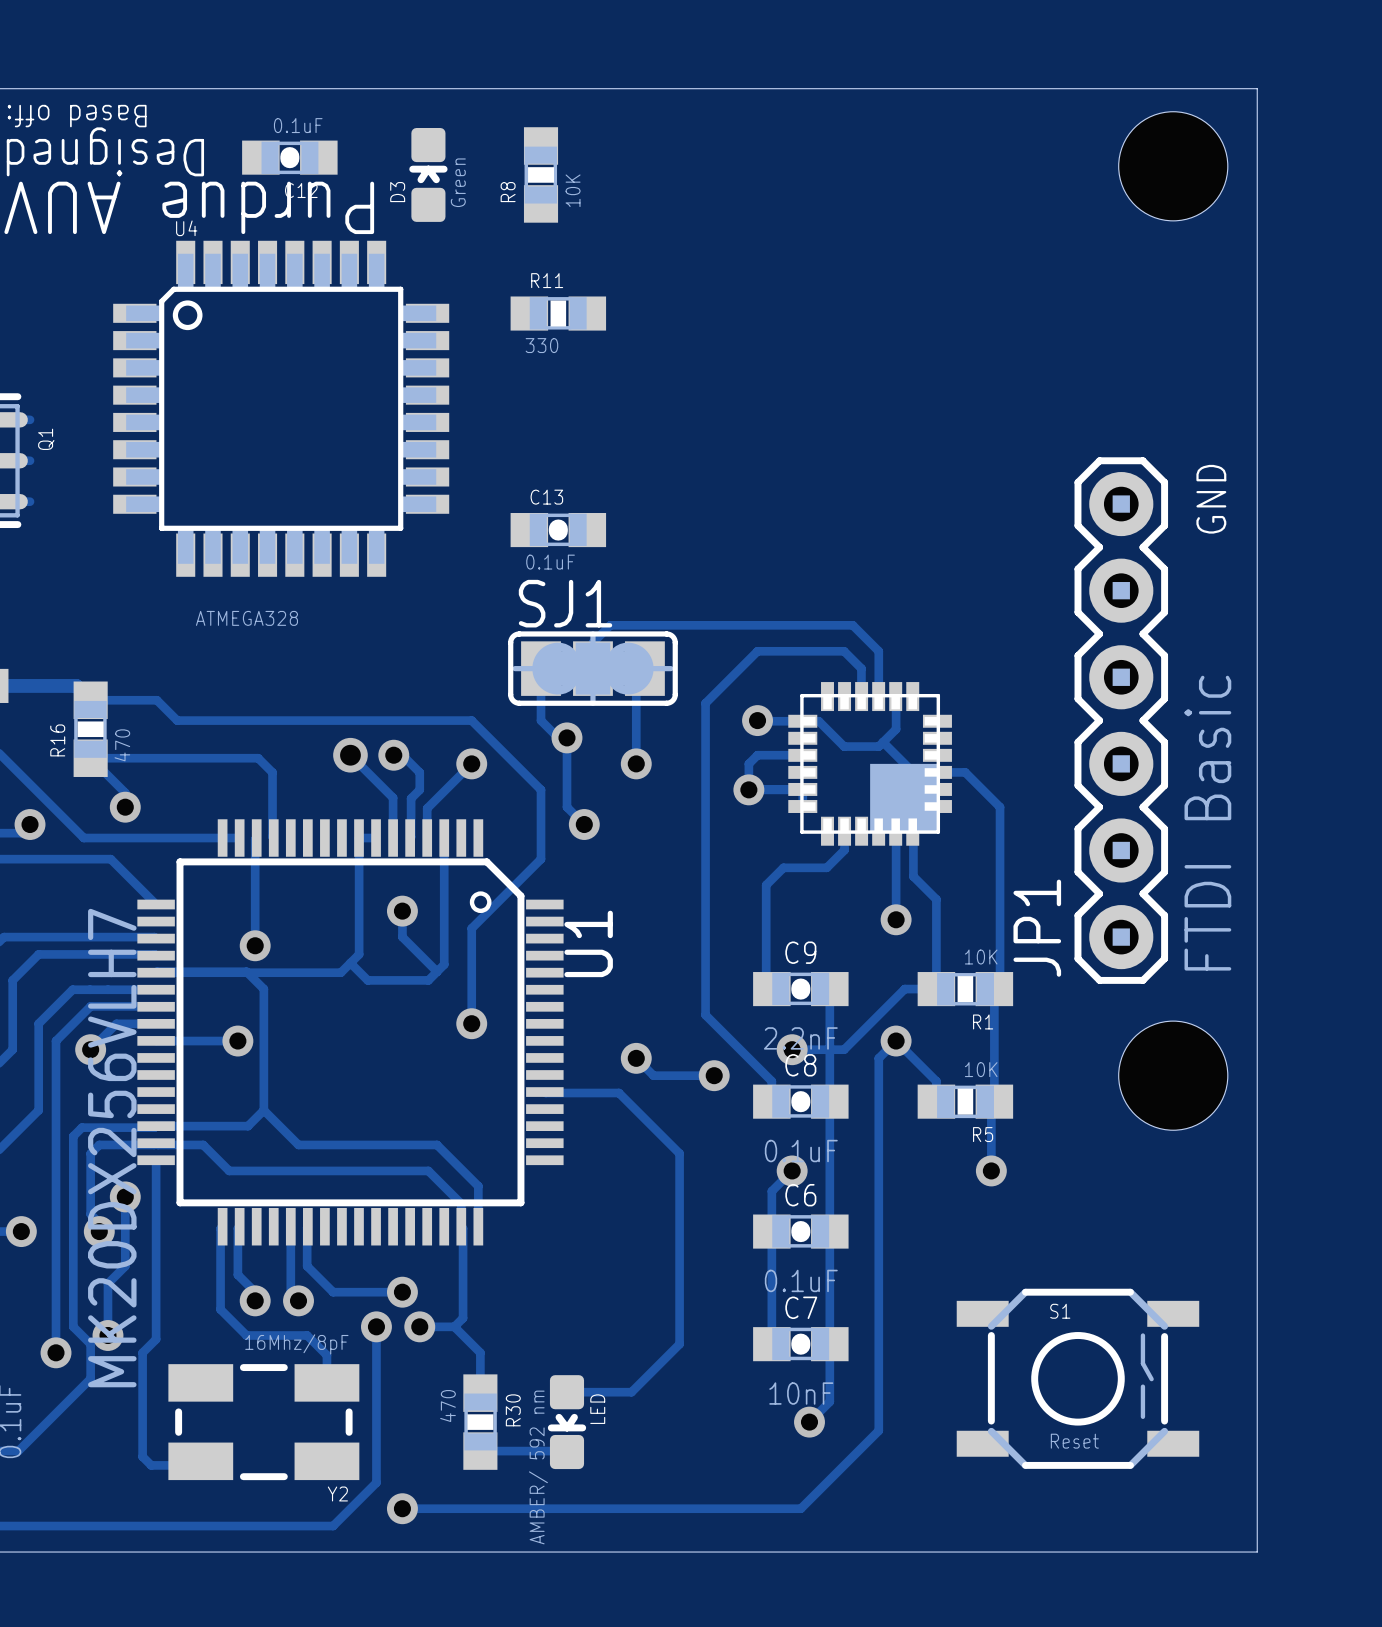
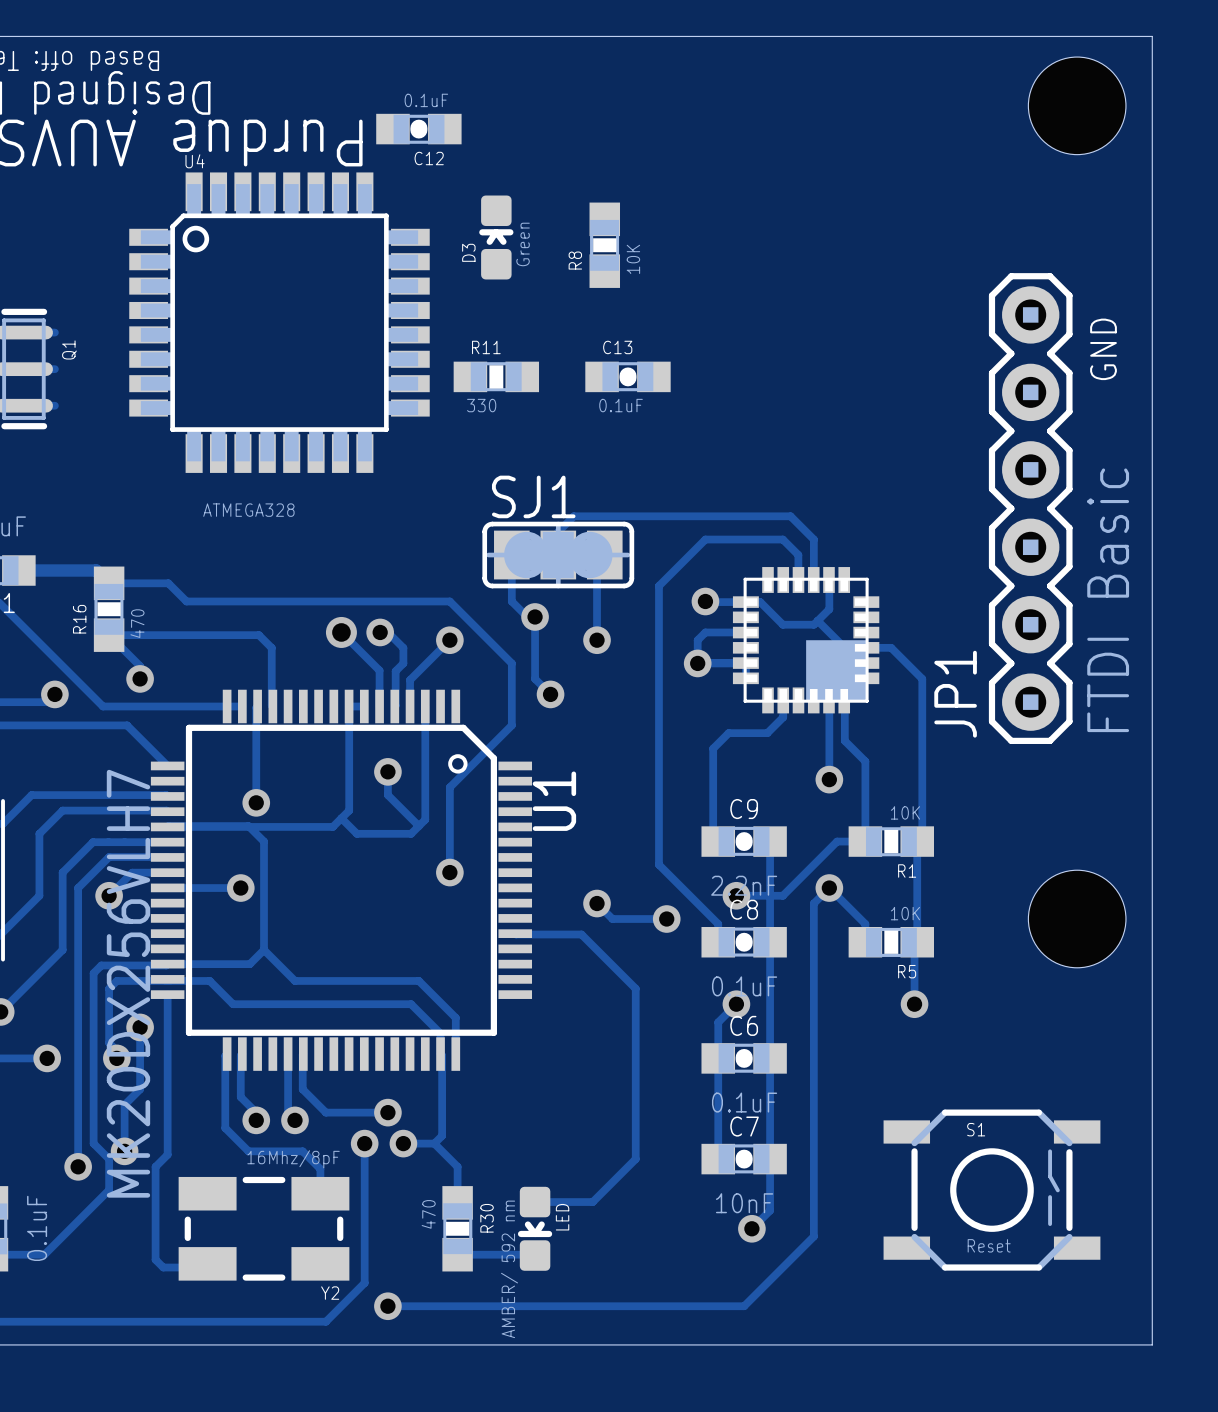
C12 position: (289, 157) -> (418, 129)
D3 position: (428, 174) -> (496, 237)
R8 position: (541, 174) -> (604, 245)
R11 position: (558, 313) -> (496, 376)
text position: GND (1211, 499) -> GND (1103, 349)
C13 position: (558, 530) -> (627, 376)
JP1 position: (1121, 720) -> (1030, 508)

